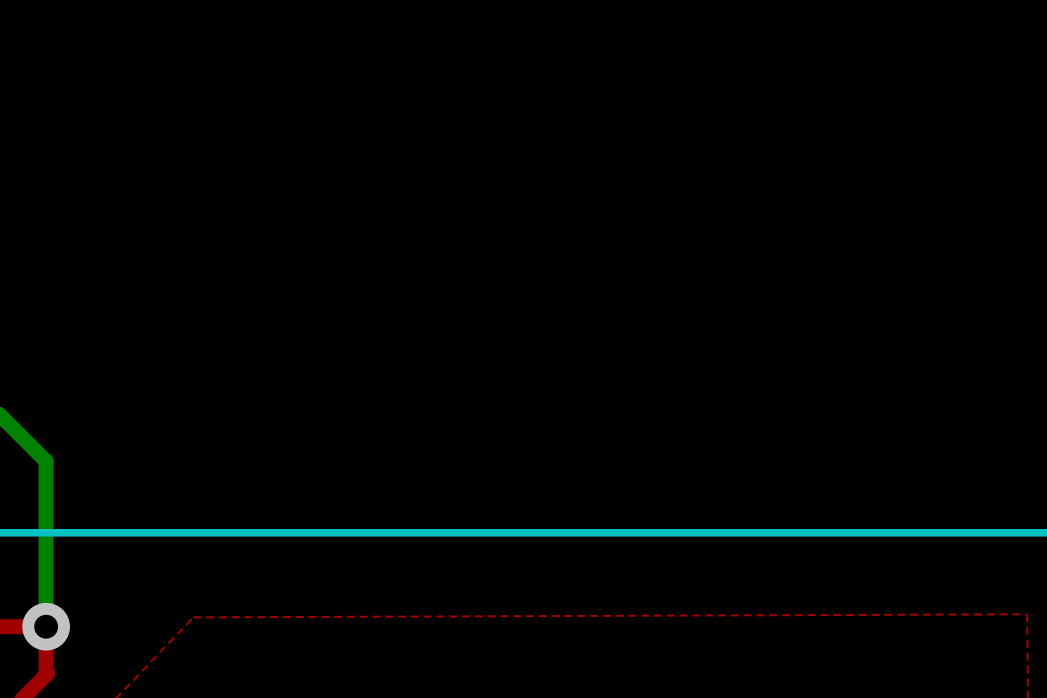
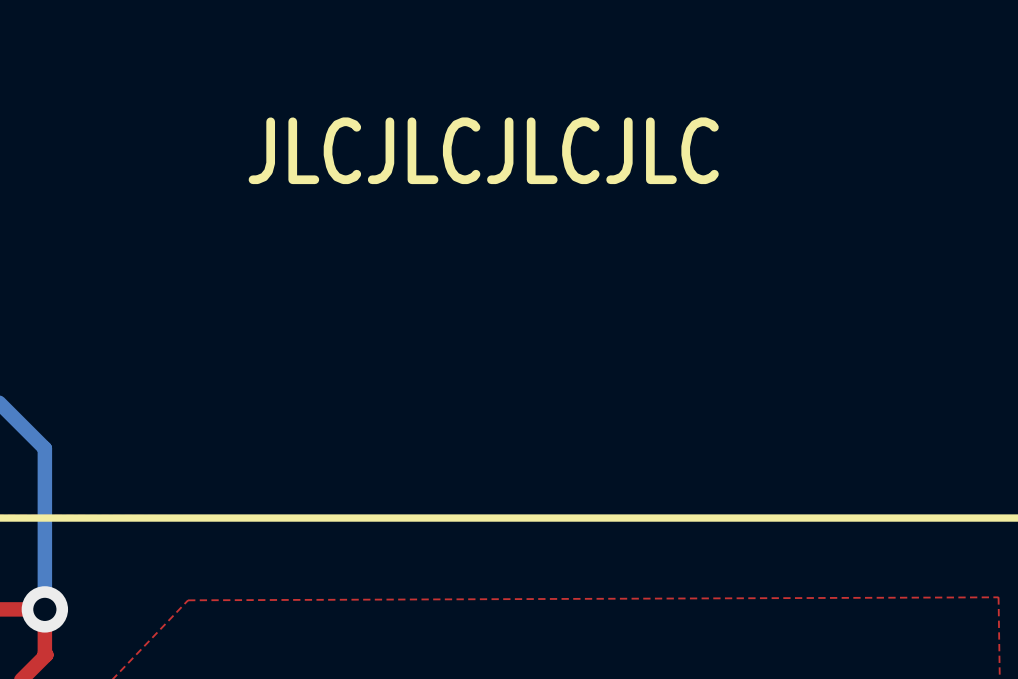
text: none -> JLCJLCJLCJLC (483, 150)

